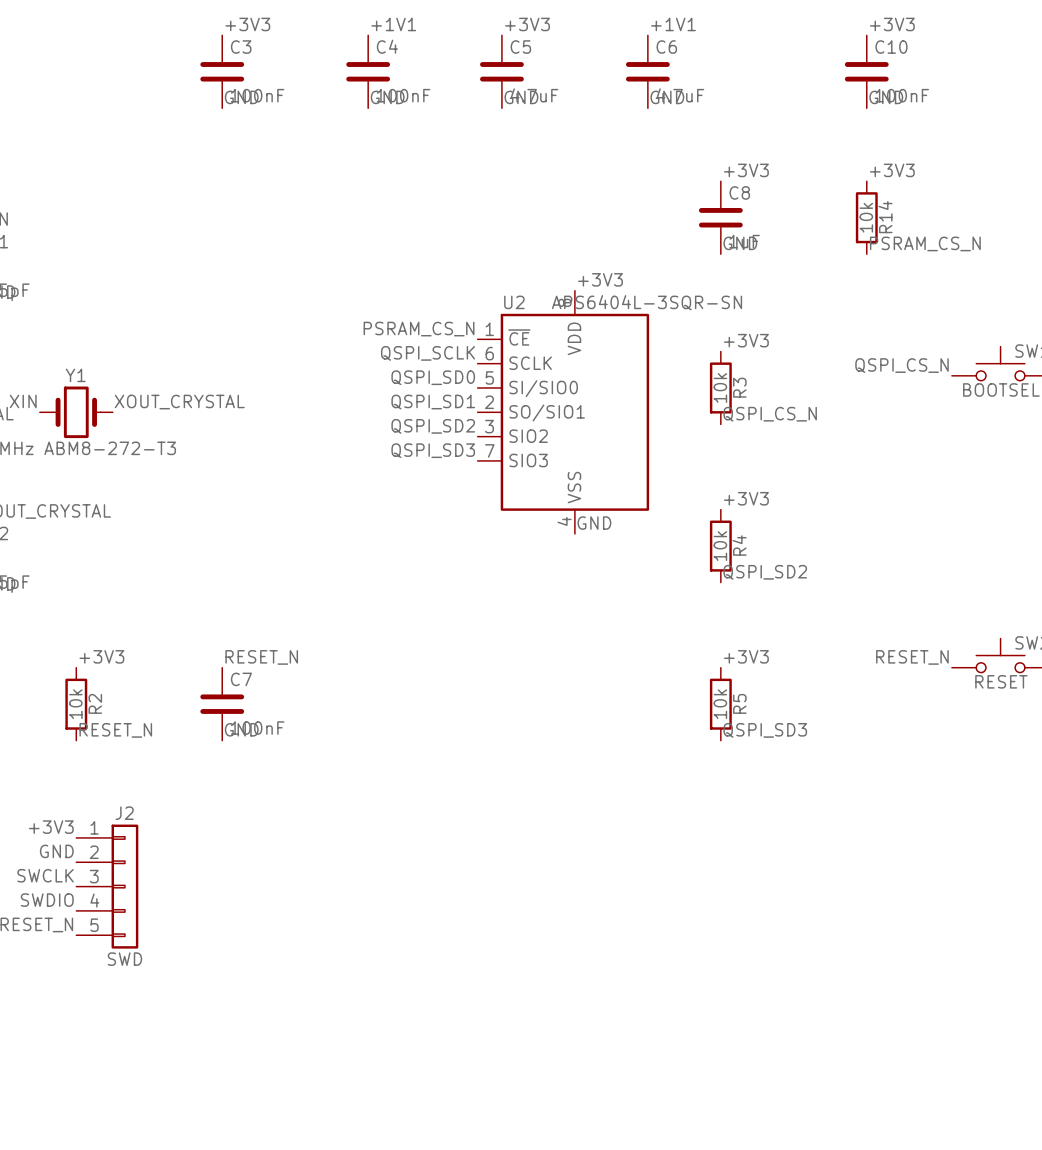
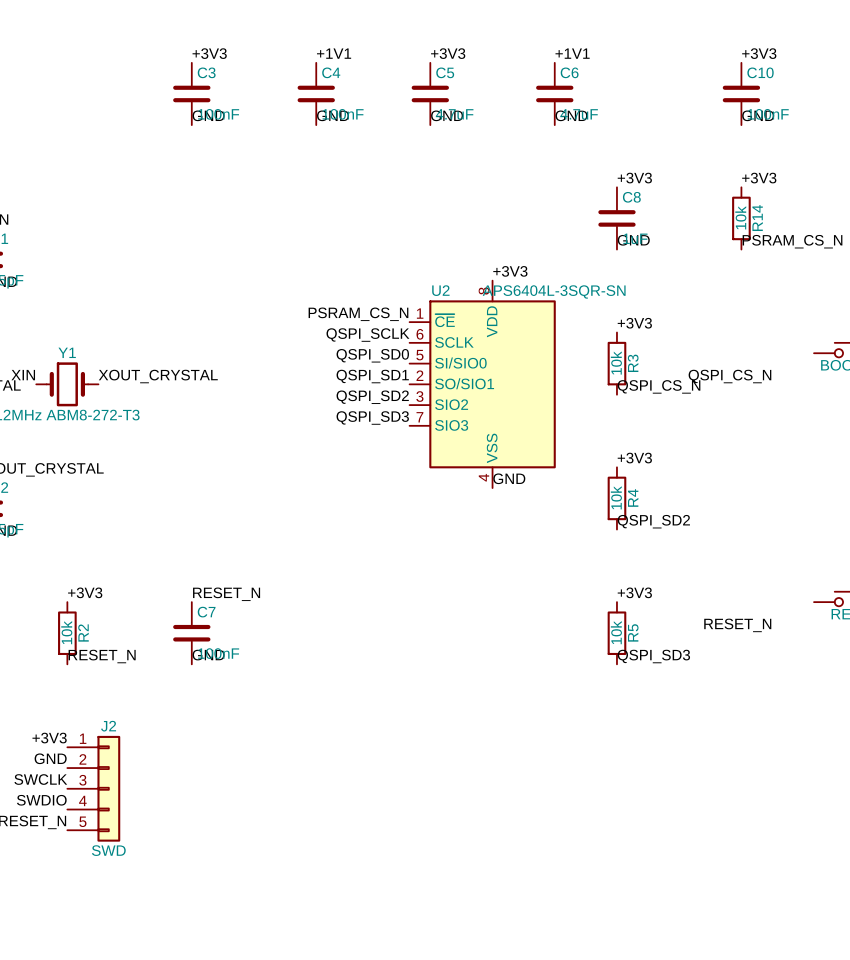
label position: QSPI_CS_N (902, 365) -> QSPI_CS_N (729, 376)
label position: RESET_N (912, 657) -> RESET_N (737, 625)

